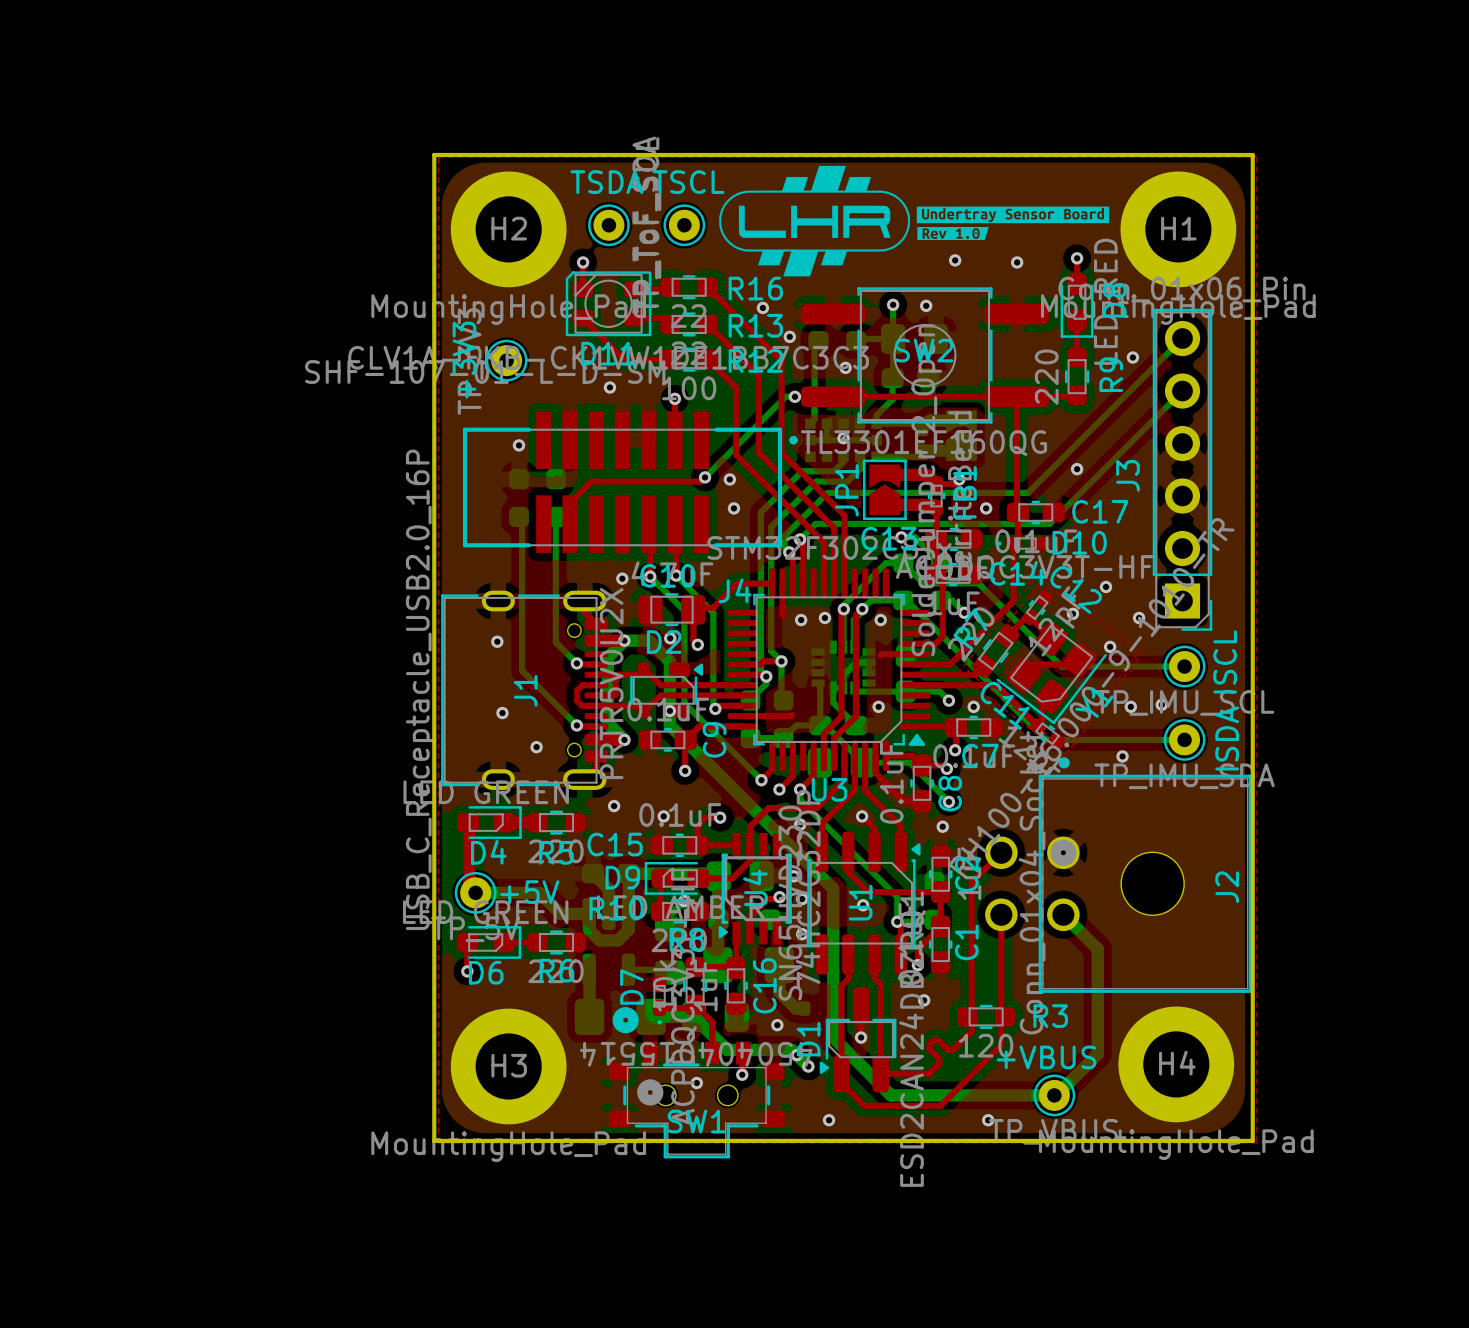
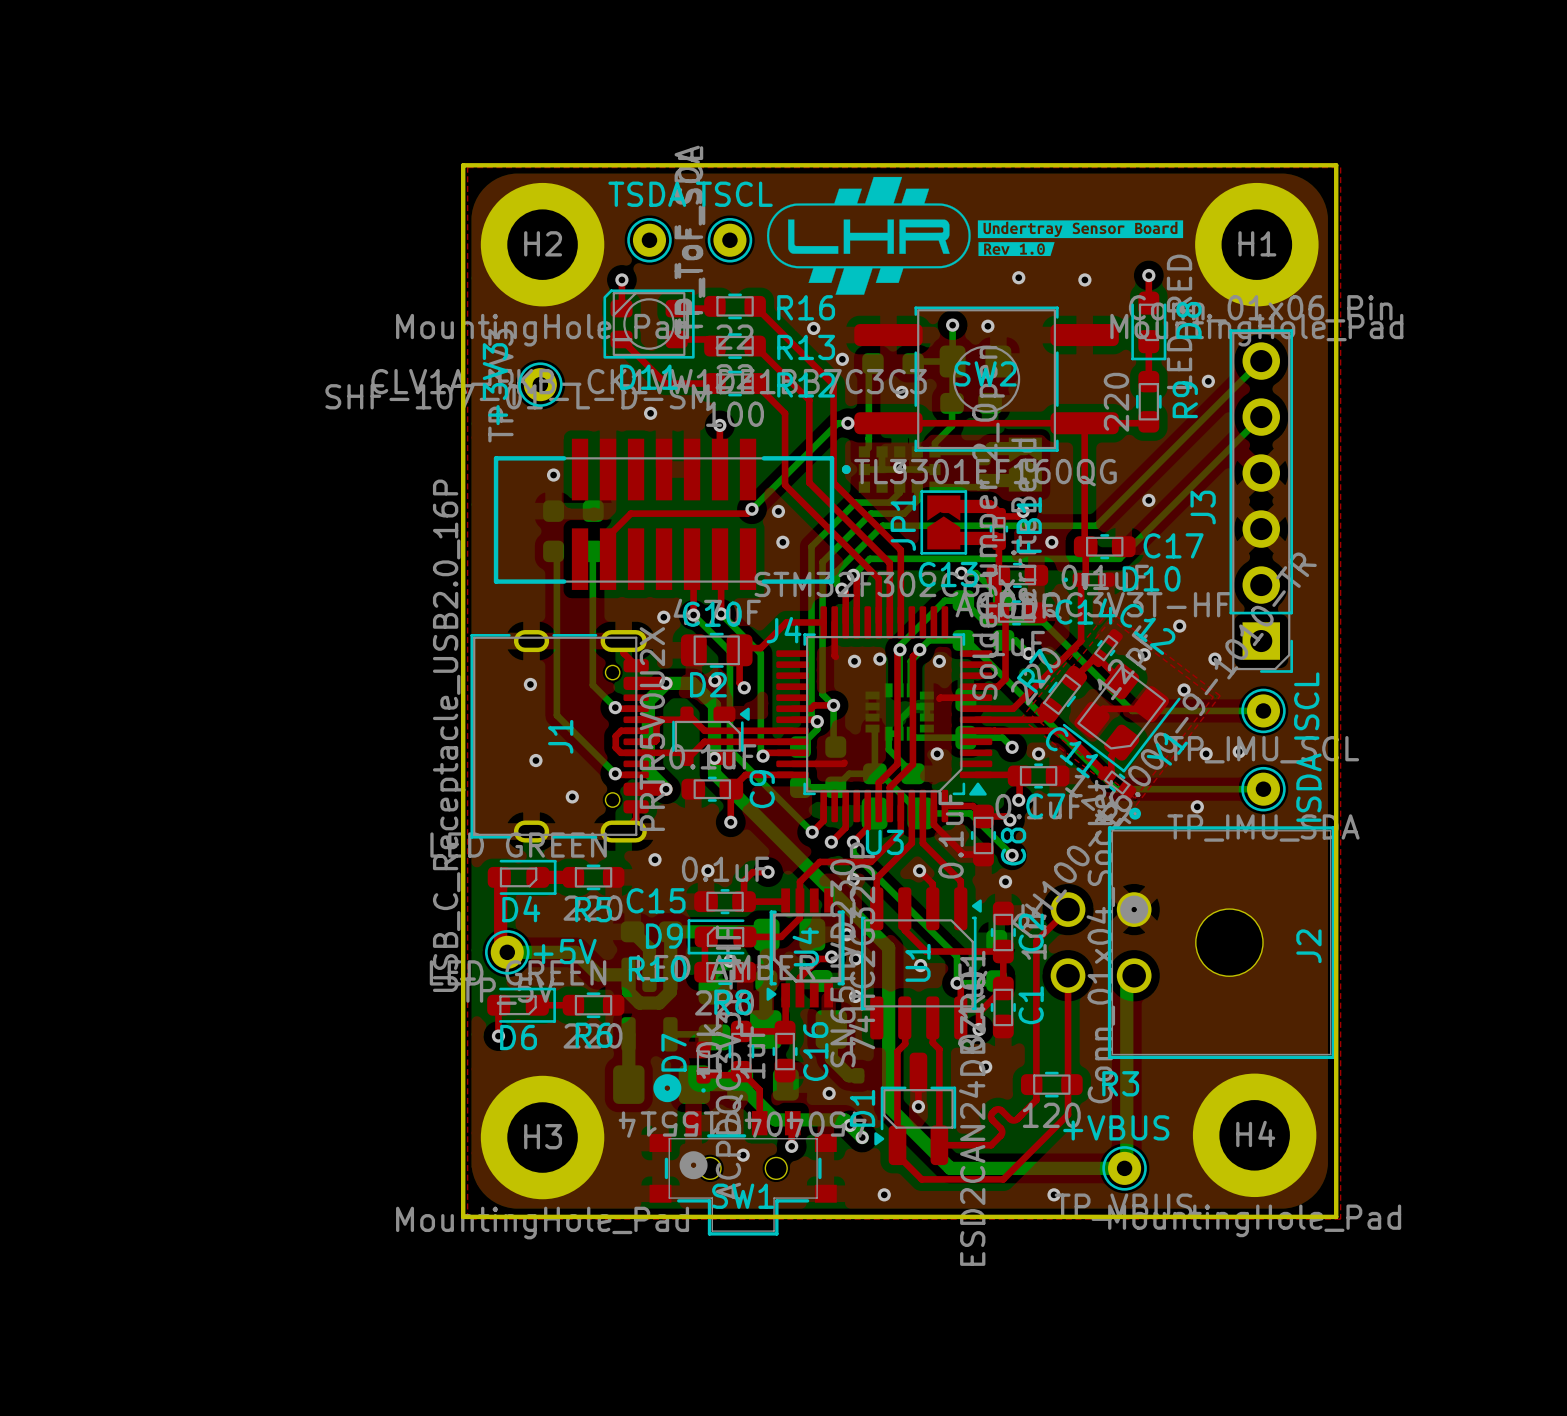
bottom track: (1063, 914) (1097, 949) (1097, 1054) (1056, 1093) -> (1134, 975) (1126, 983) (1126, 1166)

